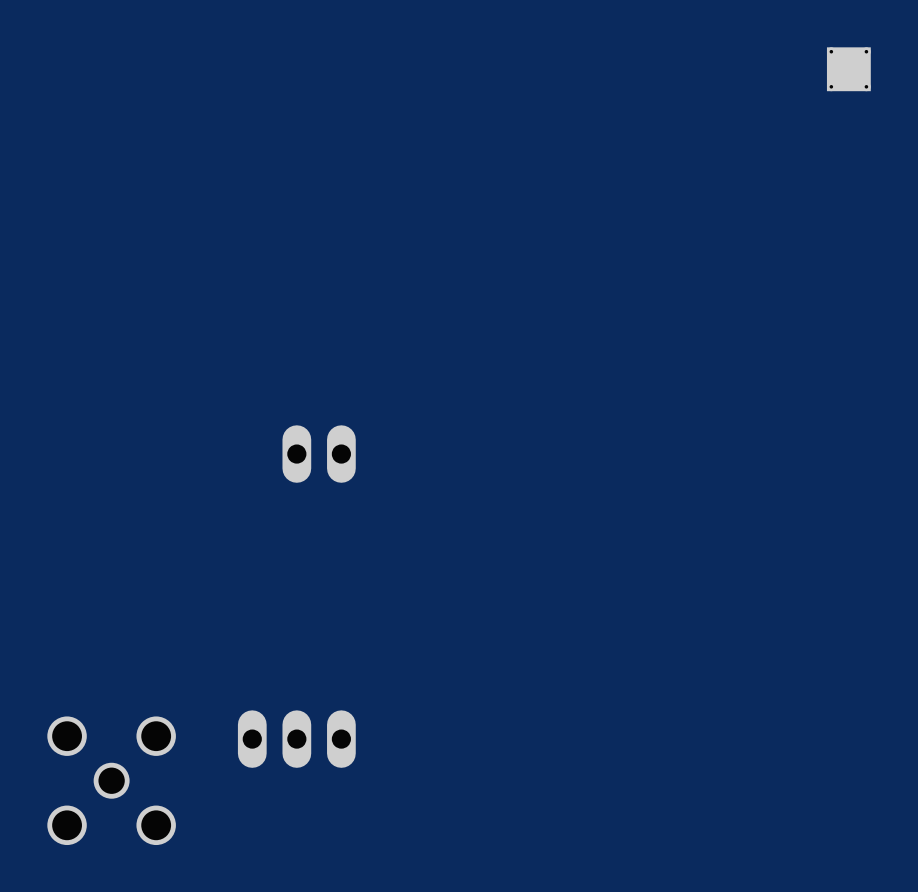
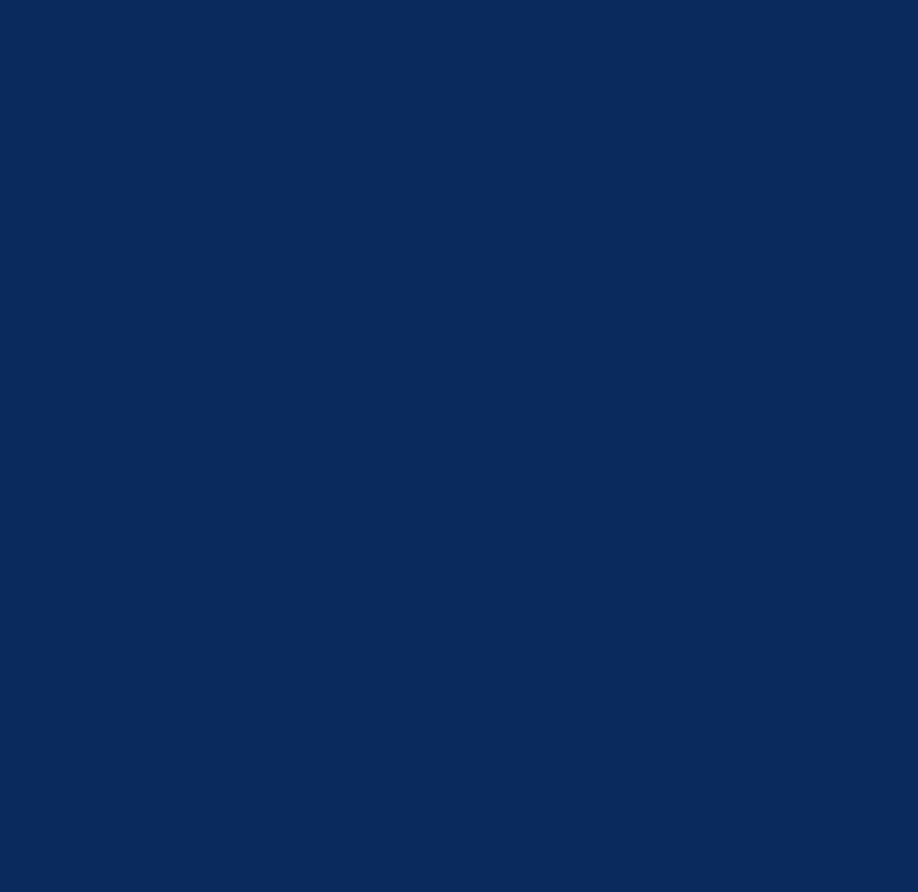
part: (848, 69) -> none
part: (319, 454) -> none
part: (296, 739) -> none
part: (111, 780) -> none

